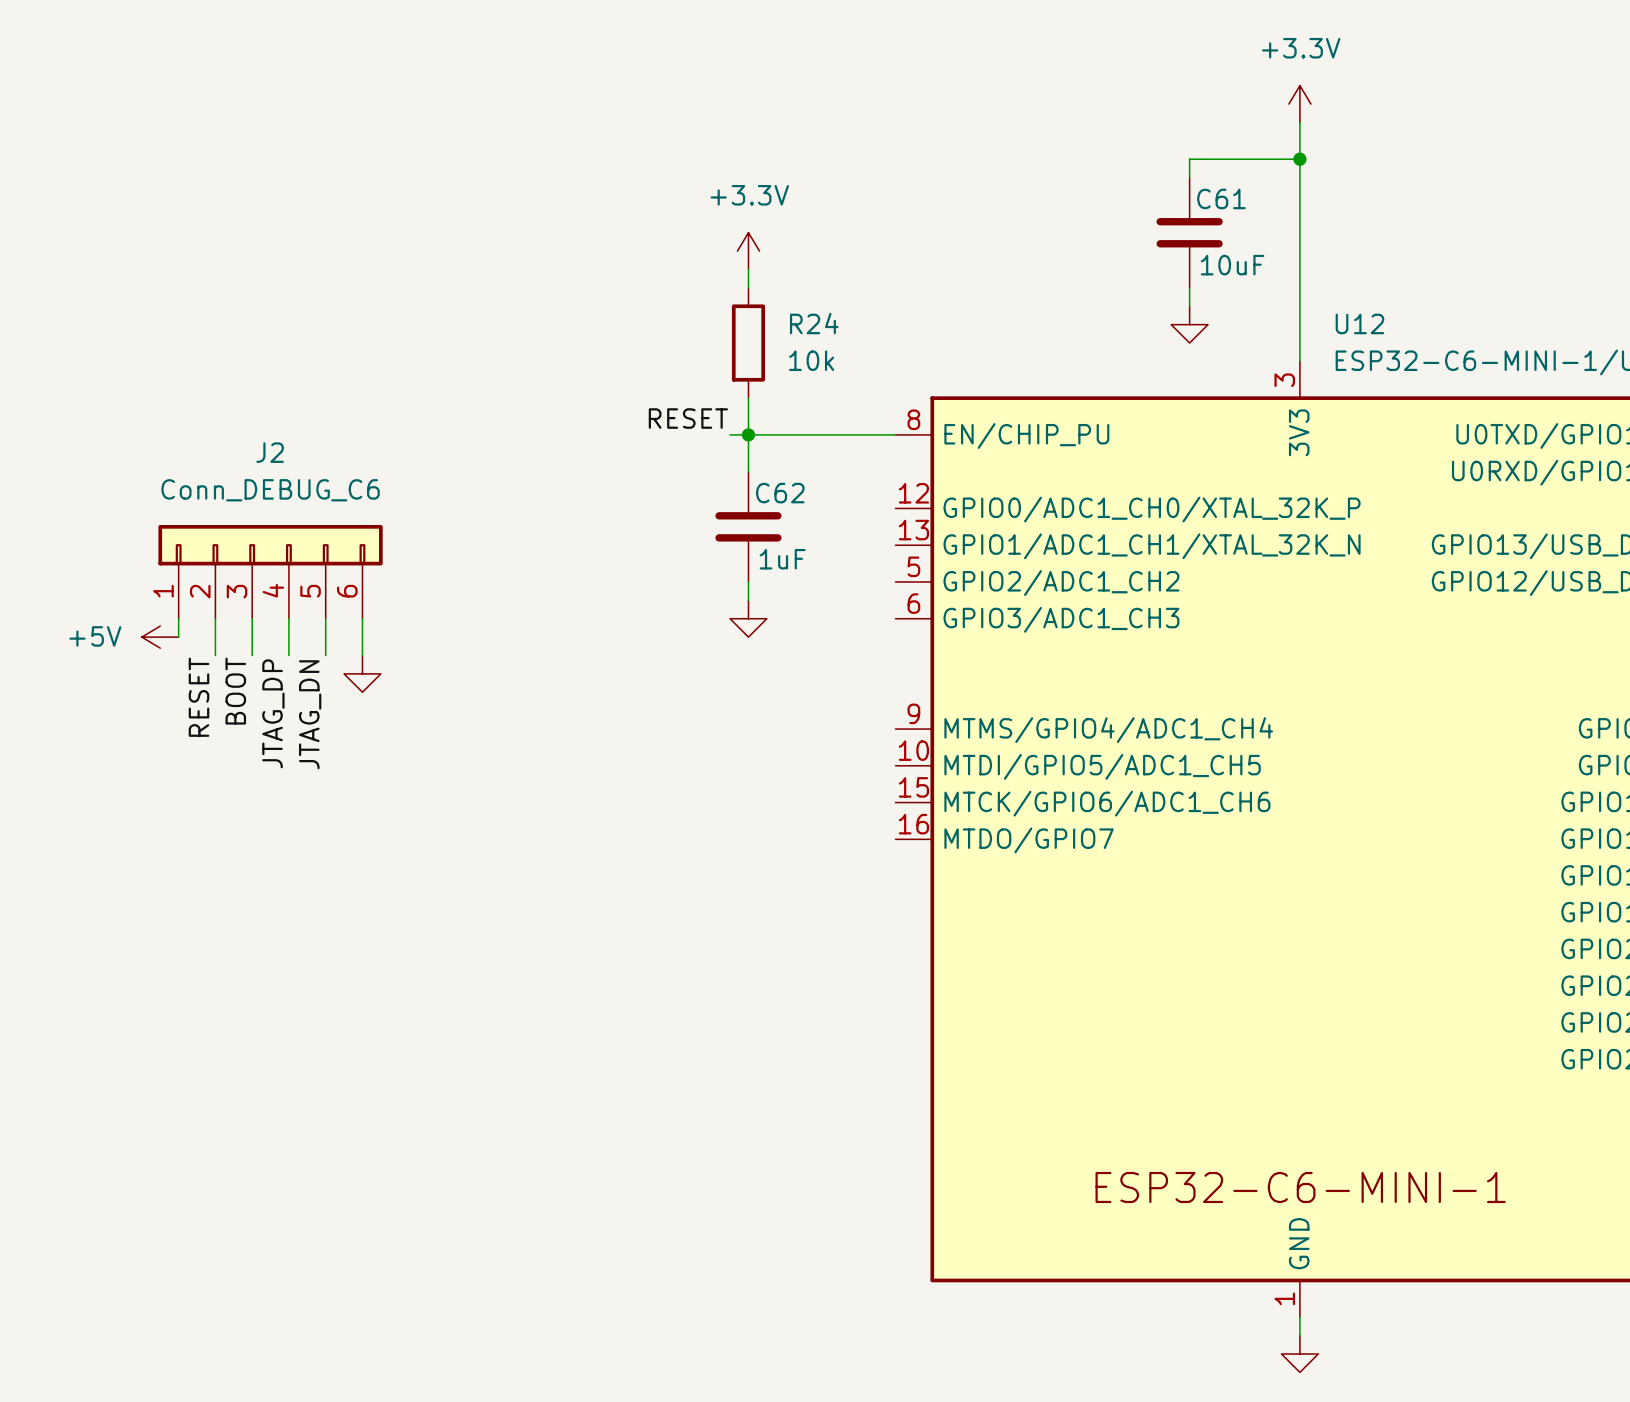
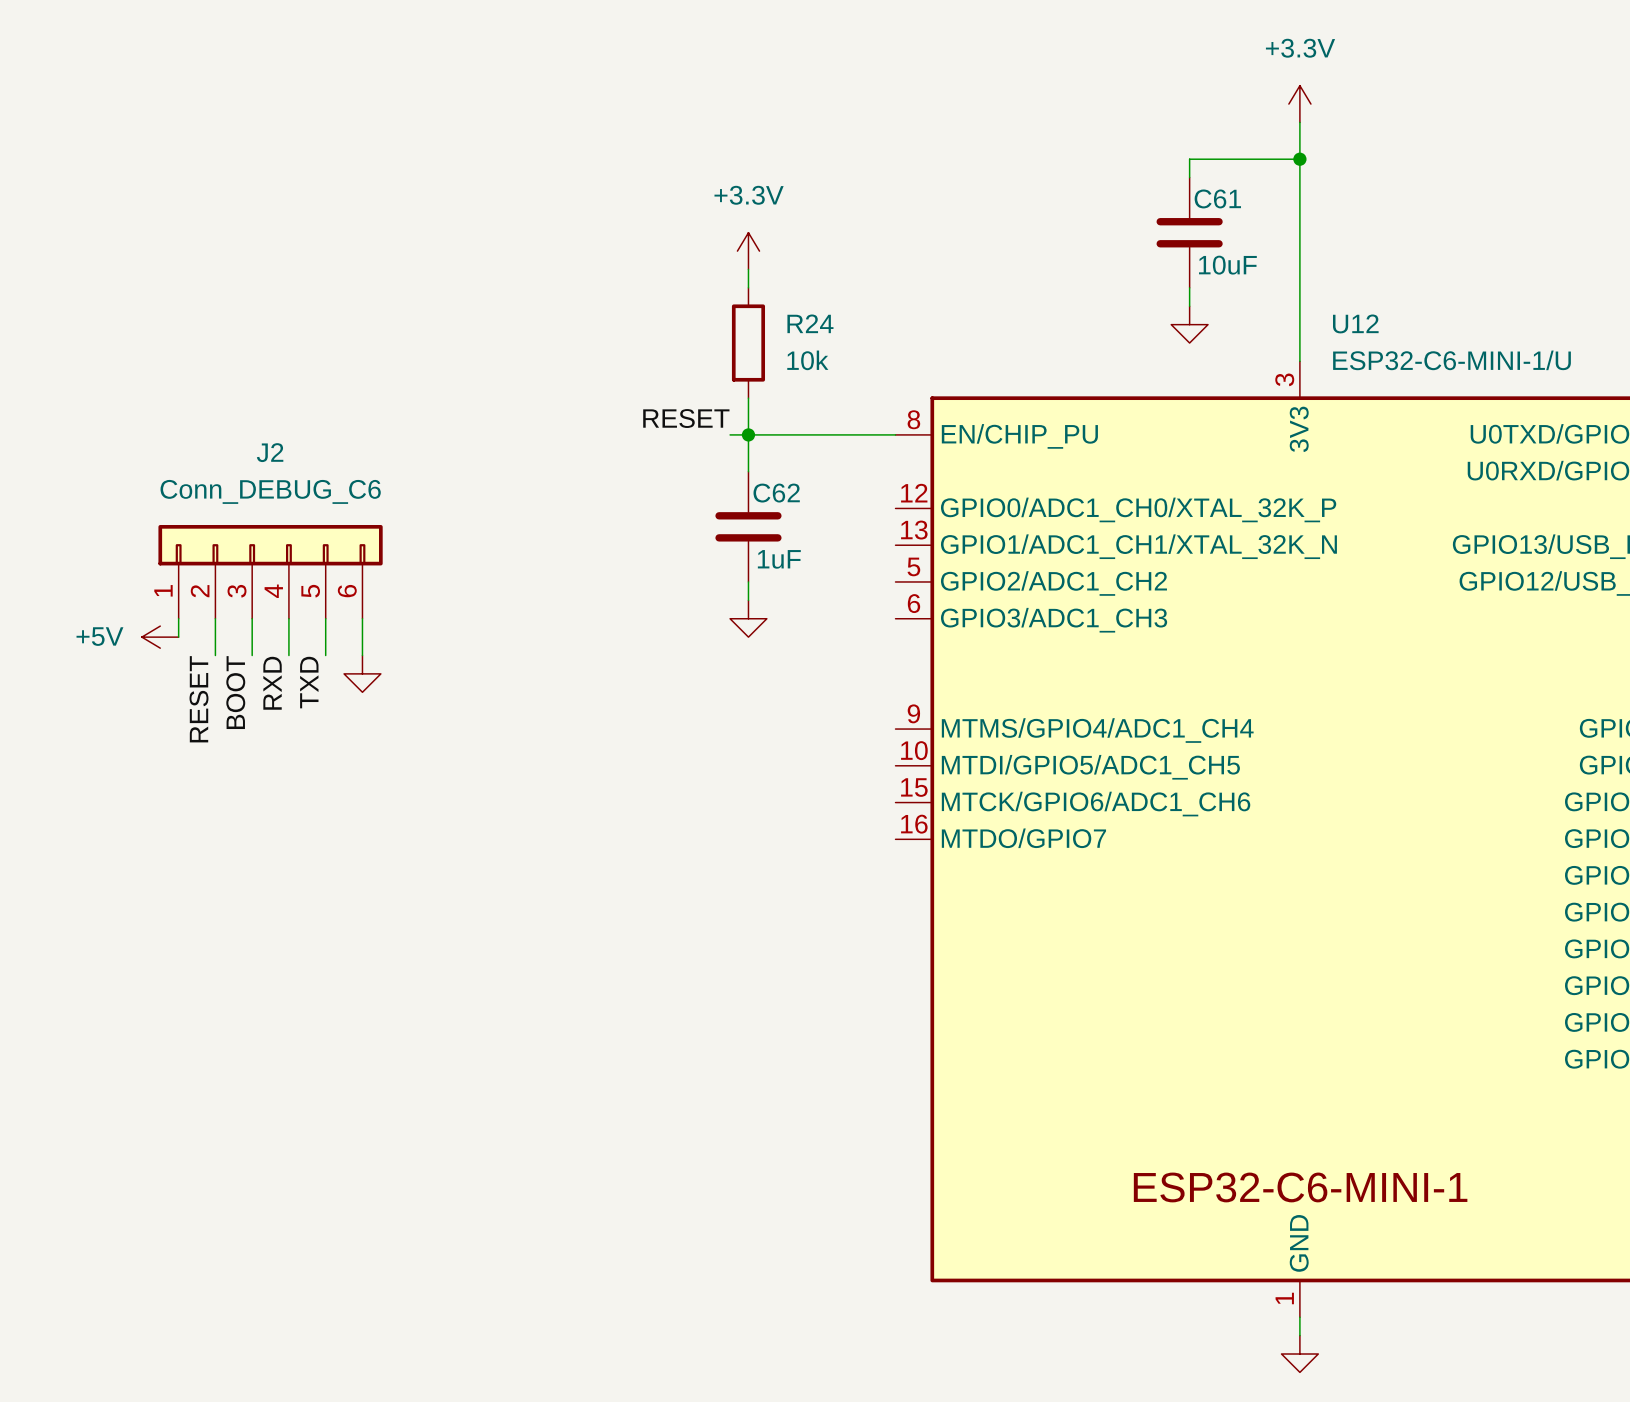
label: JTAG_DP (273, 713) -> RXD (272, 683)
label: JTAG_DN (310, 714) -> TXD (309, 682)

